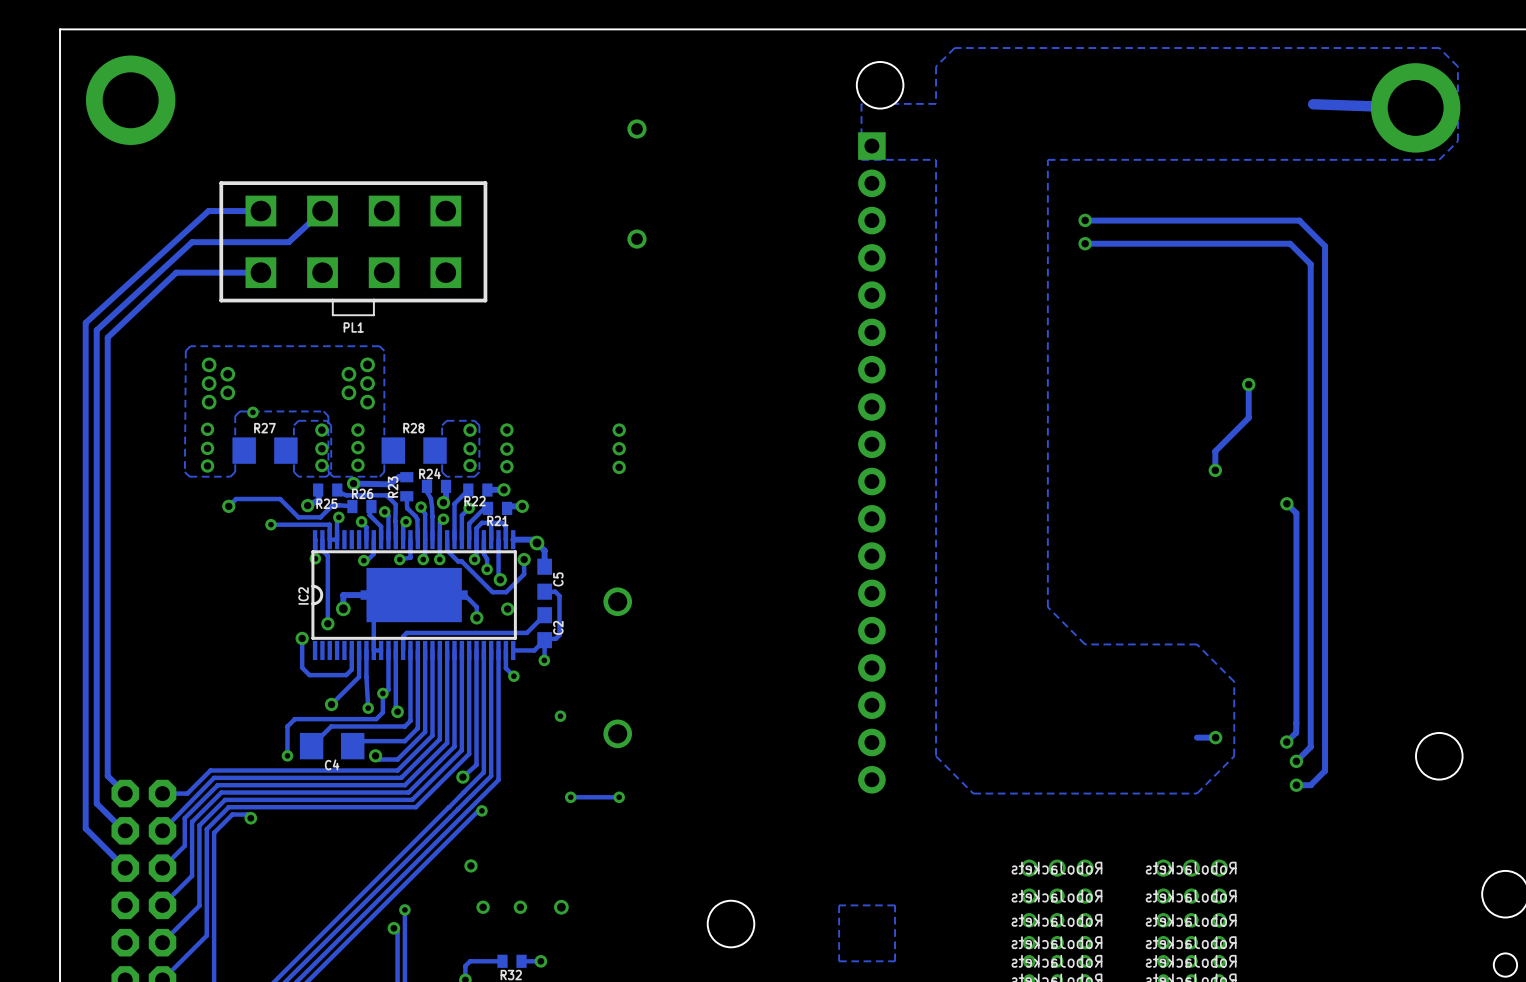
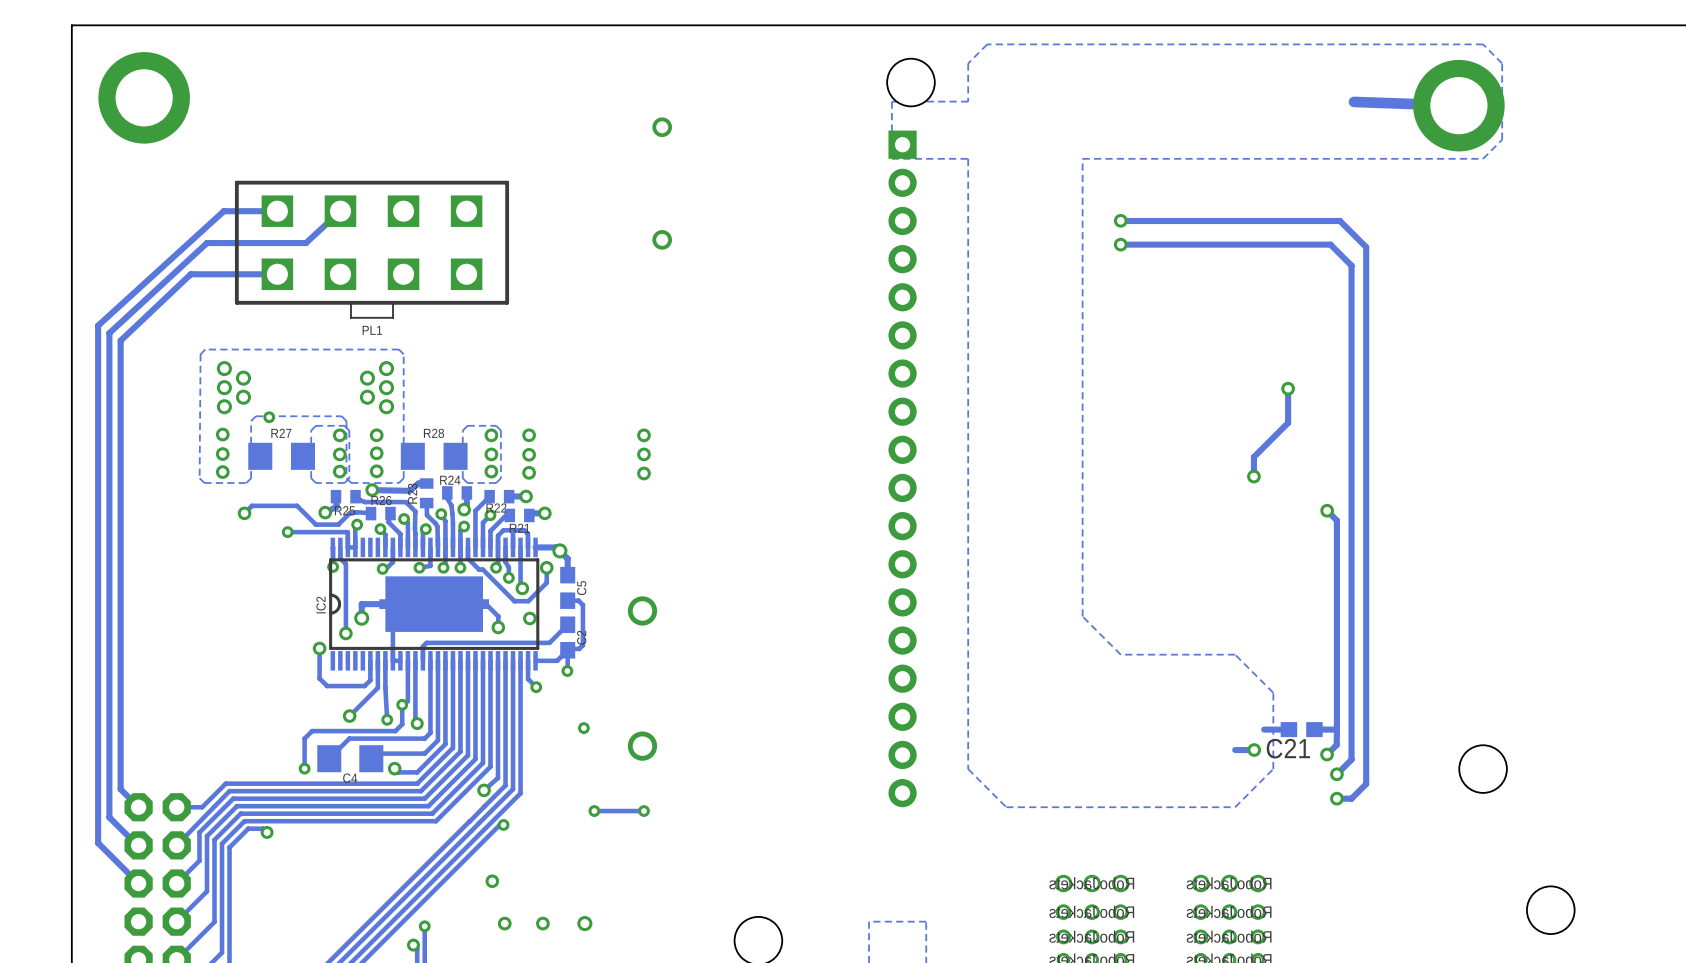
track: none -> (1288, 729) (1264, 729)
C21: none -> (1301, 729)
track: none -> (1336, 729) (1314, 729)

